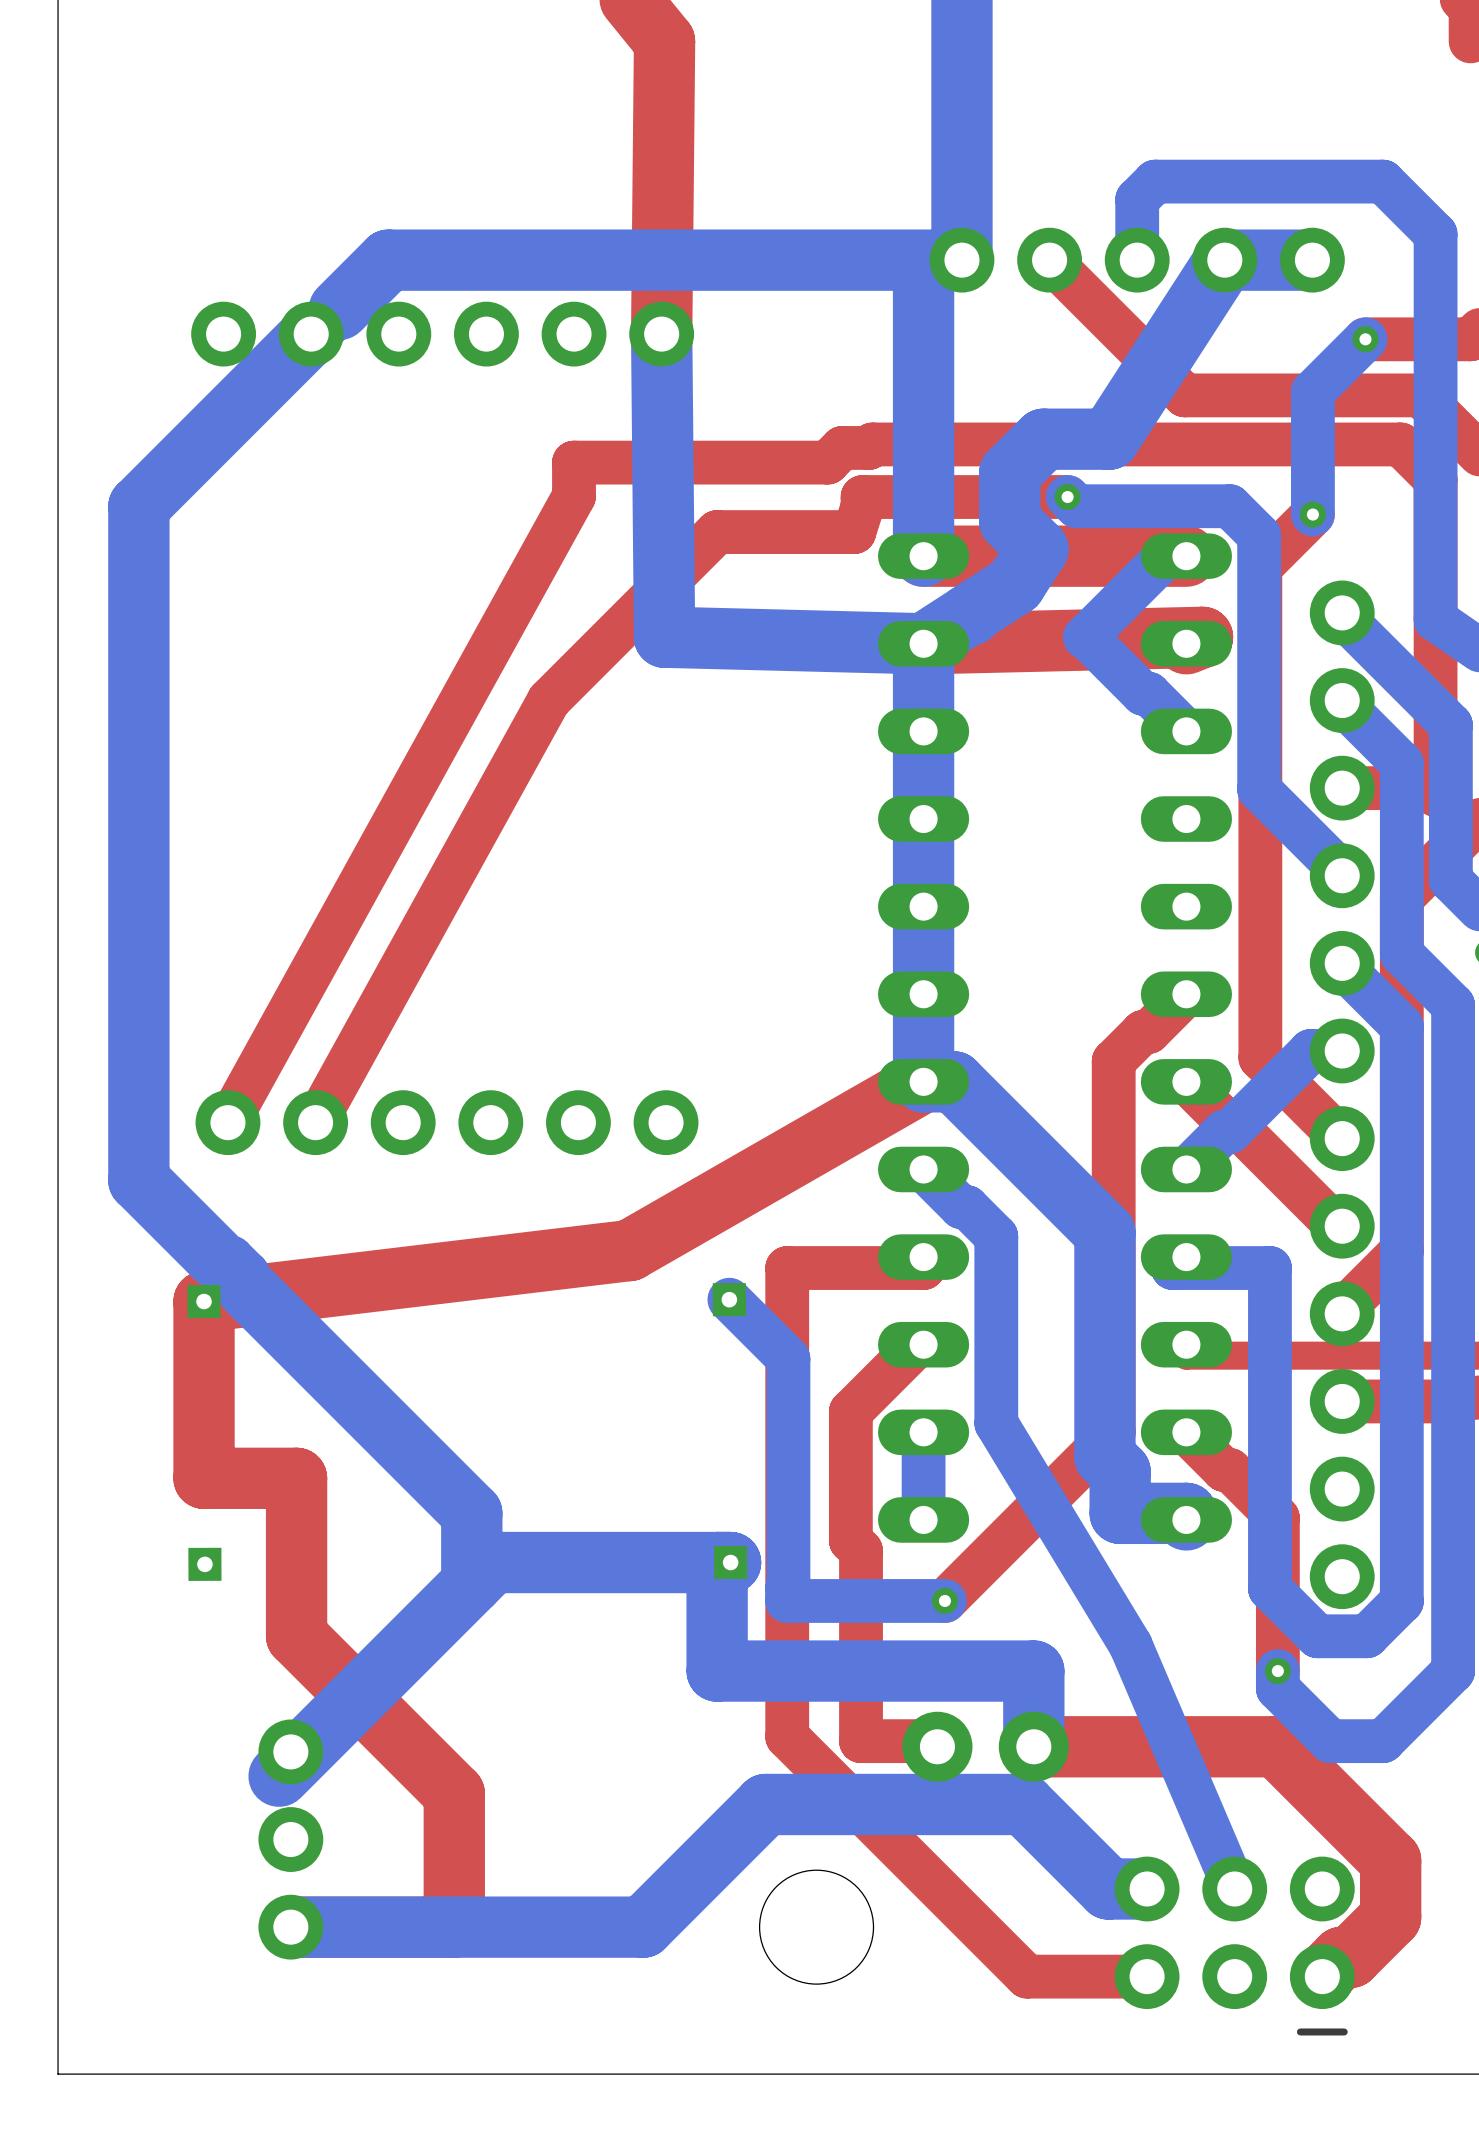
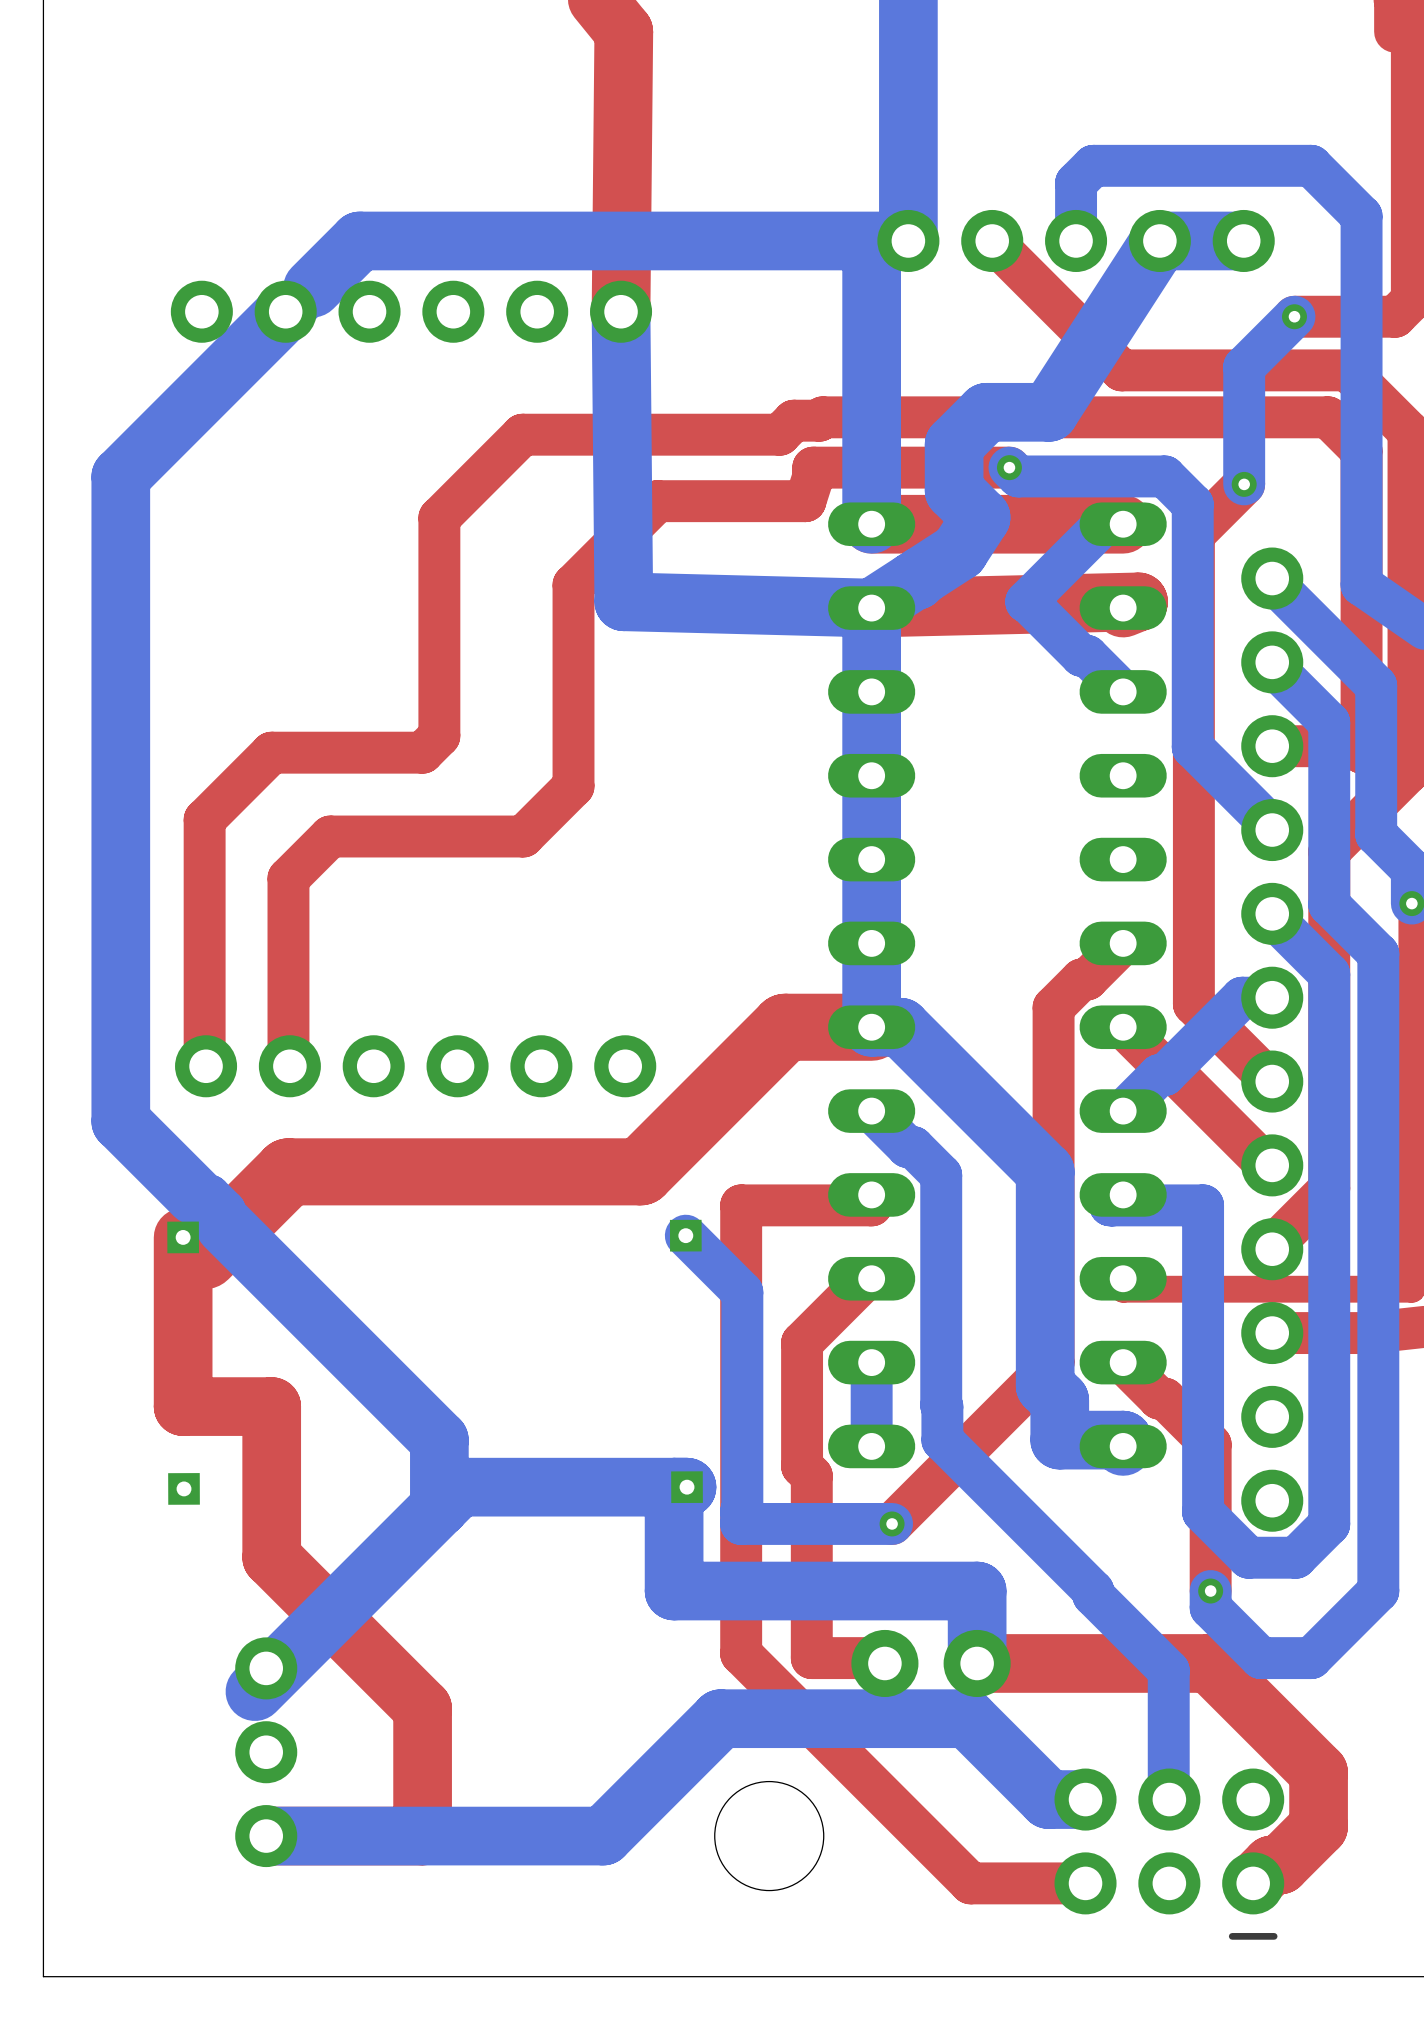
top track: (573, 462) (573, 496) (227, 1122) -> (537, 434) (522, 434) (439, 517) (439, 735) (422, 752) (271, 752) (204, 819) (206, 1066)
top track: (717, 532) (548, 700) (315, 1122) -> (674, 501) (657, 501) (573, 585) (573, 786) (523, 836) (330, 836) (288, 878) (289, 1066)
top track: (923, 1081) (629, 1250) (204, 1301) -> (871, 1027) (785, 1027) (640, 1171) (288, 1171) (204, 1255)
bottom track: (996, 1423) (1130, 1645) (1234, 1889) -> (941, 1353) (942, 1440) (1093, 1591) (1093, 1595) (1168, 1670) (1169, 1799)

